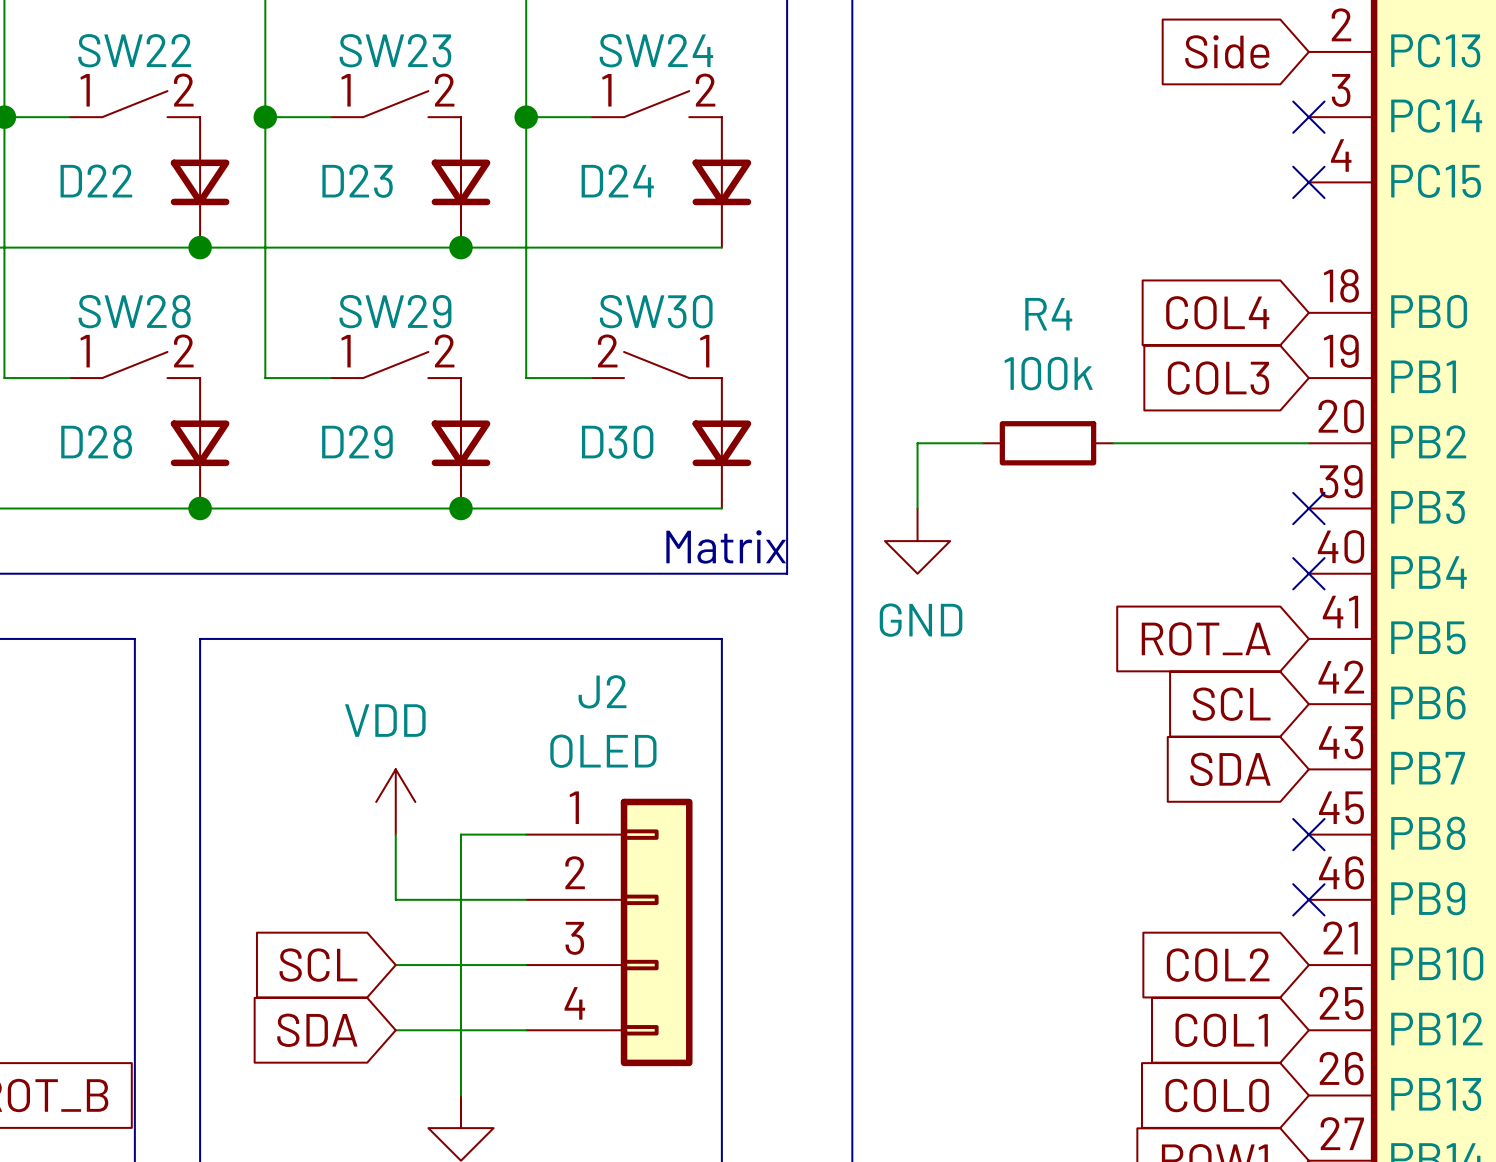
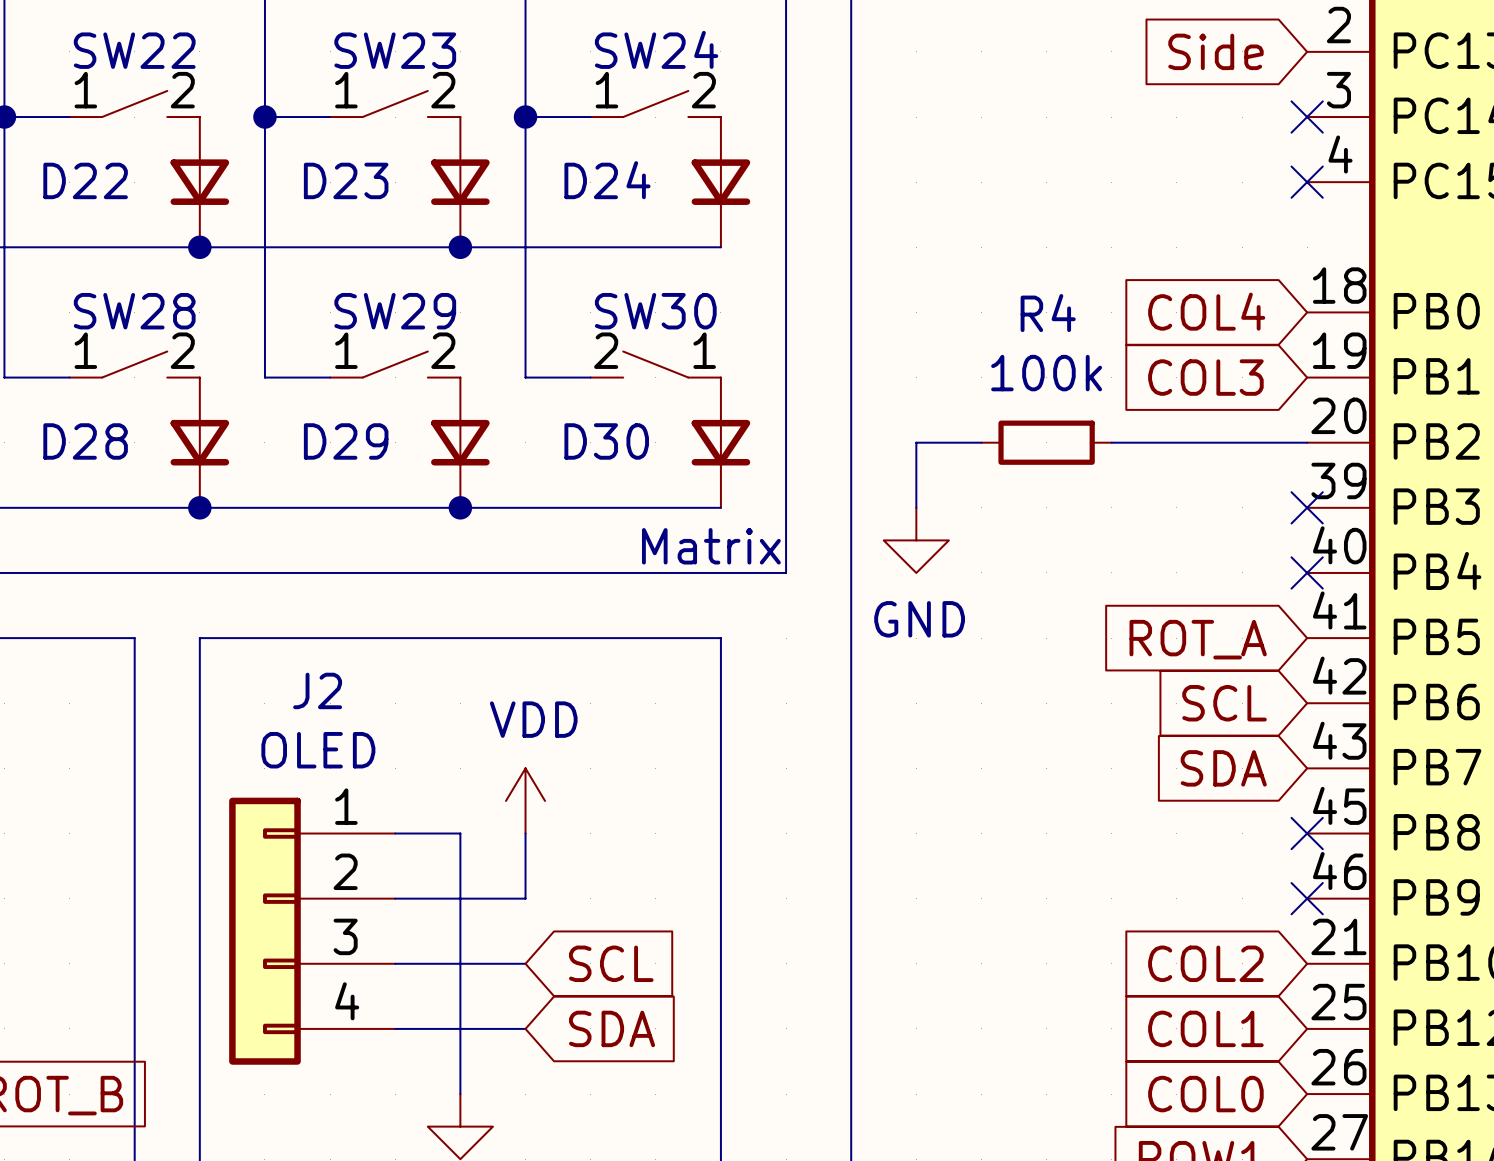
power symbol text position: VDD (385, 720) -> VDD (533, 719)
power symbol position: VDD (395, 802) -> VDD (525, 800)
wire: (395, 834) (395, 899) -> (395, 833) (460, 833)
wire: (460, 834) (526, 834) -> (525, 898) (525, 833)
J2 position: (609, 932) -> (312, 931)
J2 flip: as is (656, 932) -> left-right (264, 931)
global label rotation: 0° (318, 965) -> 180° (611, 963)
global label position: SCL (318, 965) -> SCL (611, 963)
global label rotation: 0° (317, 1030) -> 180° (612, 1028)
global label position: SDA (317, 1030) -> SDA (612, 1028)

